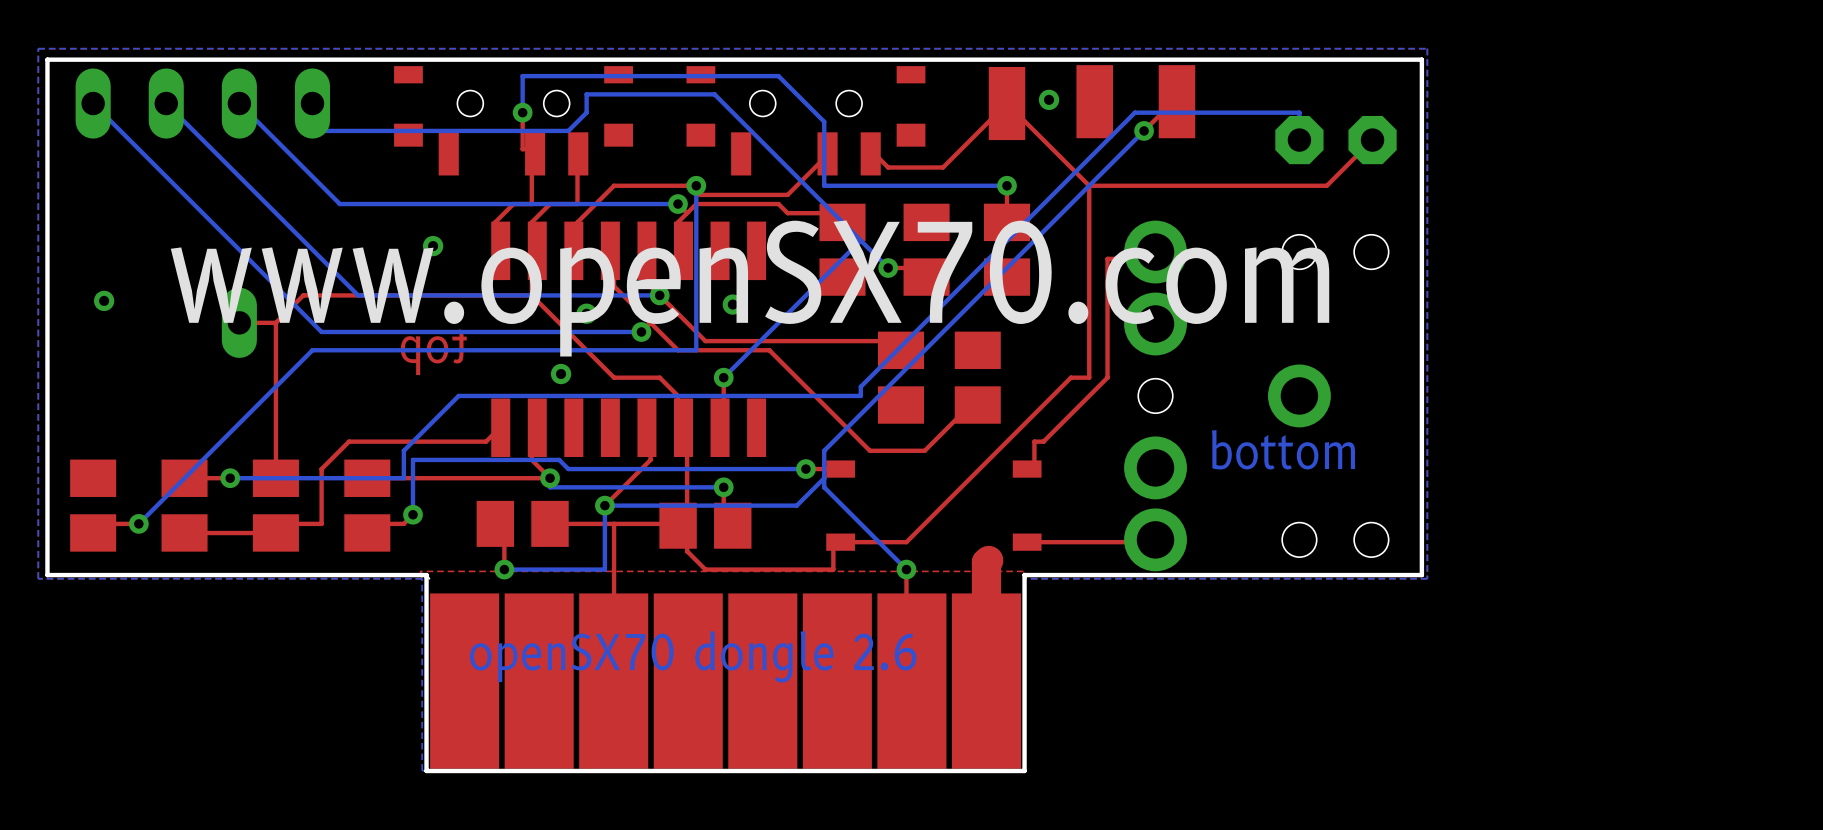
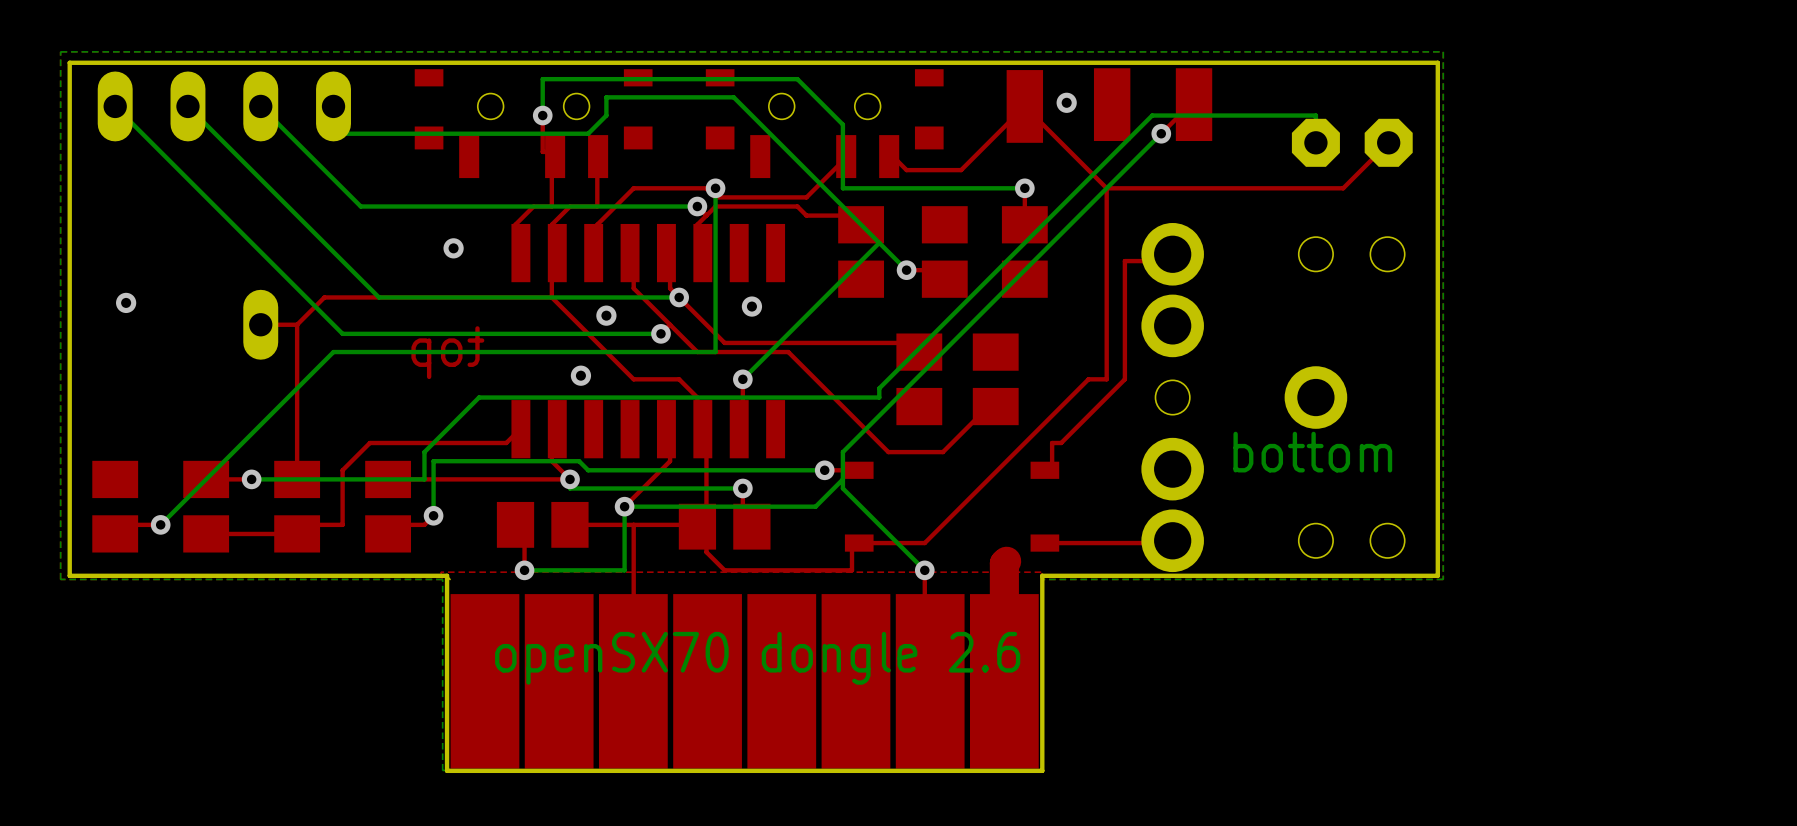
text: www.openSX70.com (750, 288) -> none

